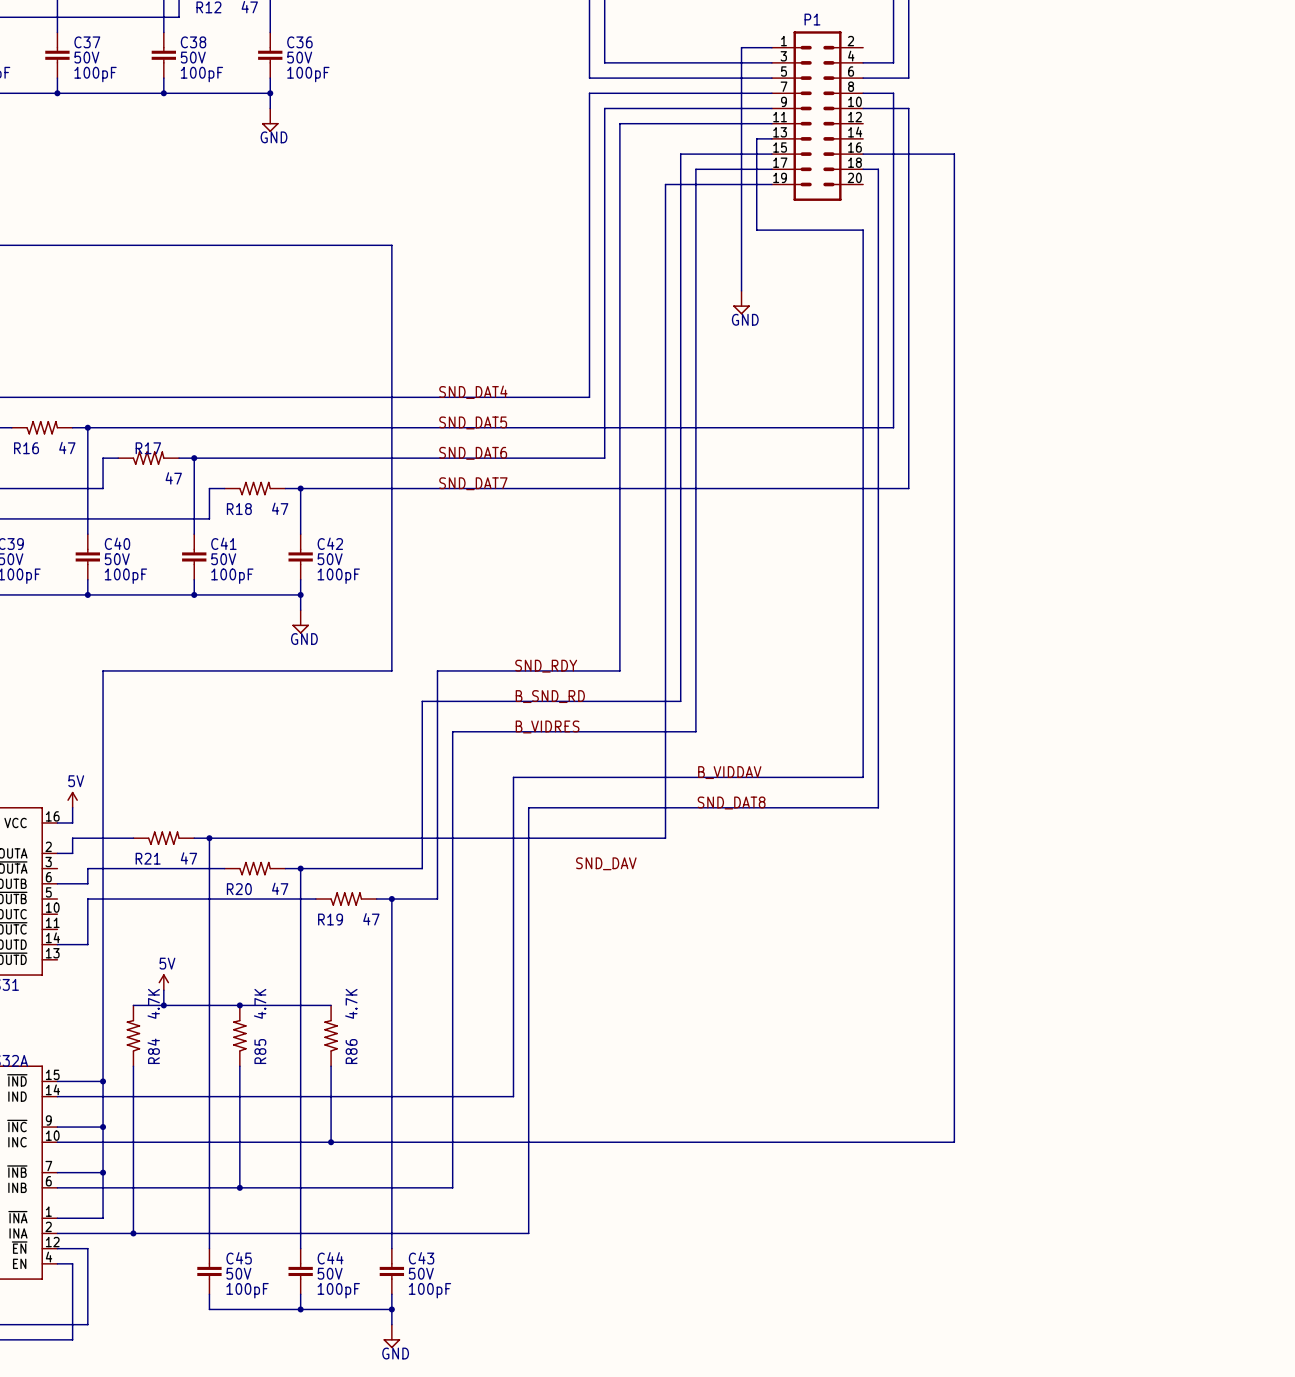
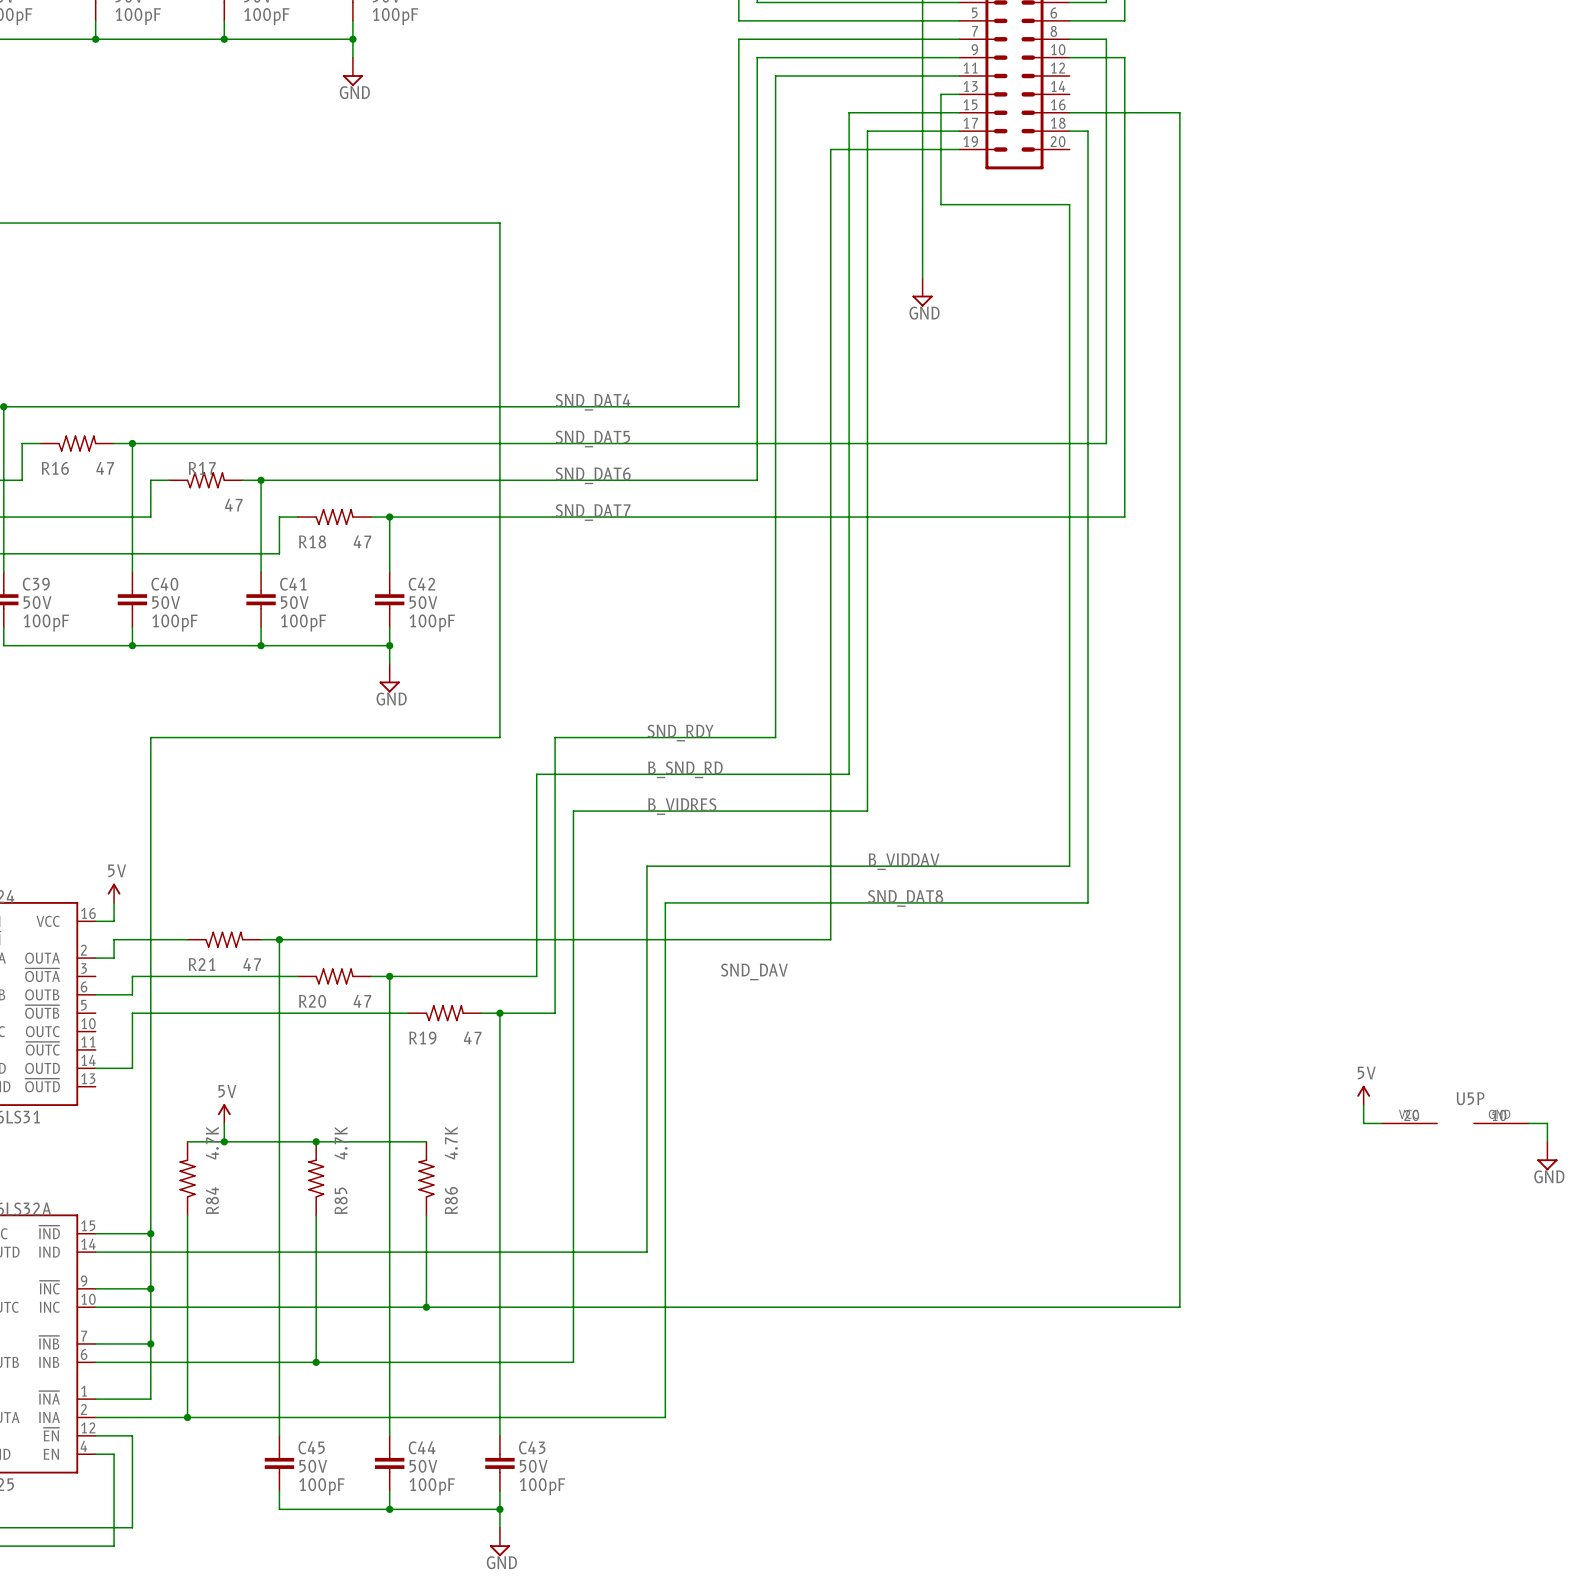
power symbol: none -> 5V (1363, 1095)
wire: none -> (1363, 1105) (1363, 1123) (1382, 1123)
U5P: none -> (1455, 1123)
wire: none -> (1529, 1123) (1547, 1123) (1547, 1141)
power symbol: none -> GND (1547, 1156)

